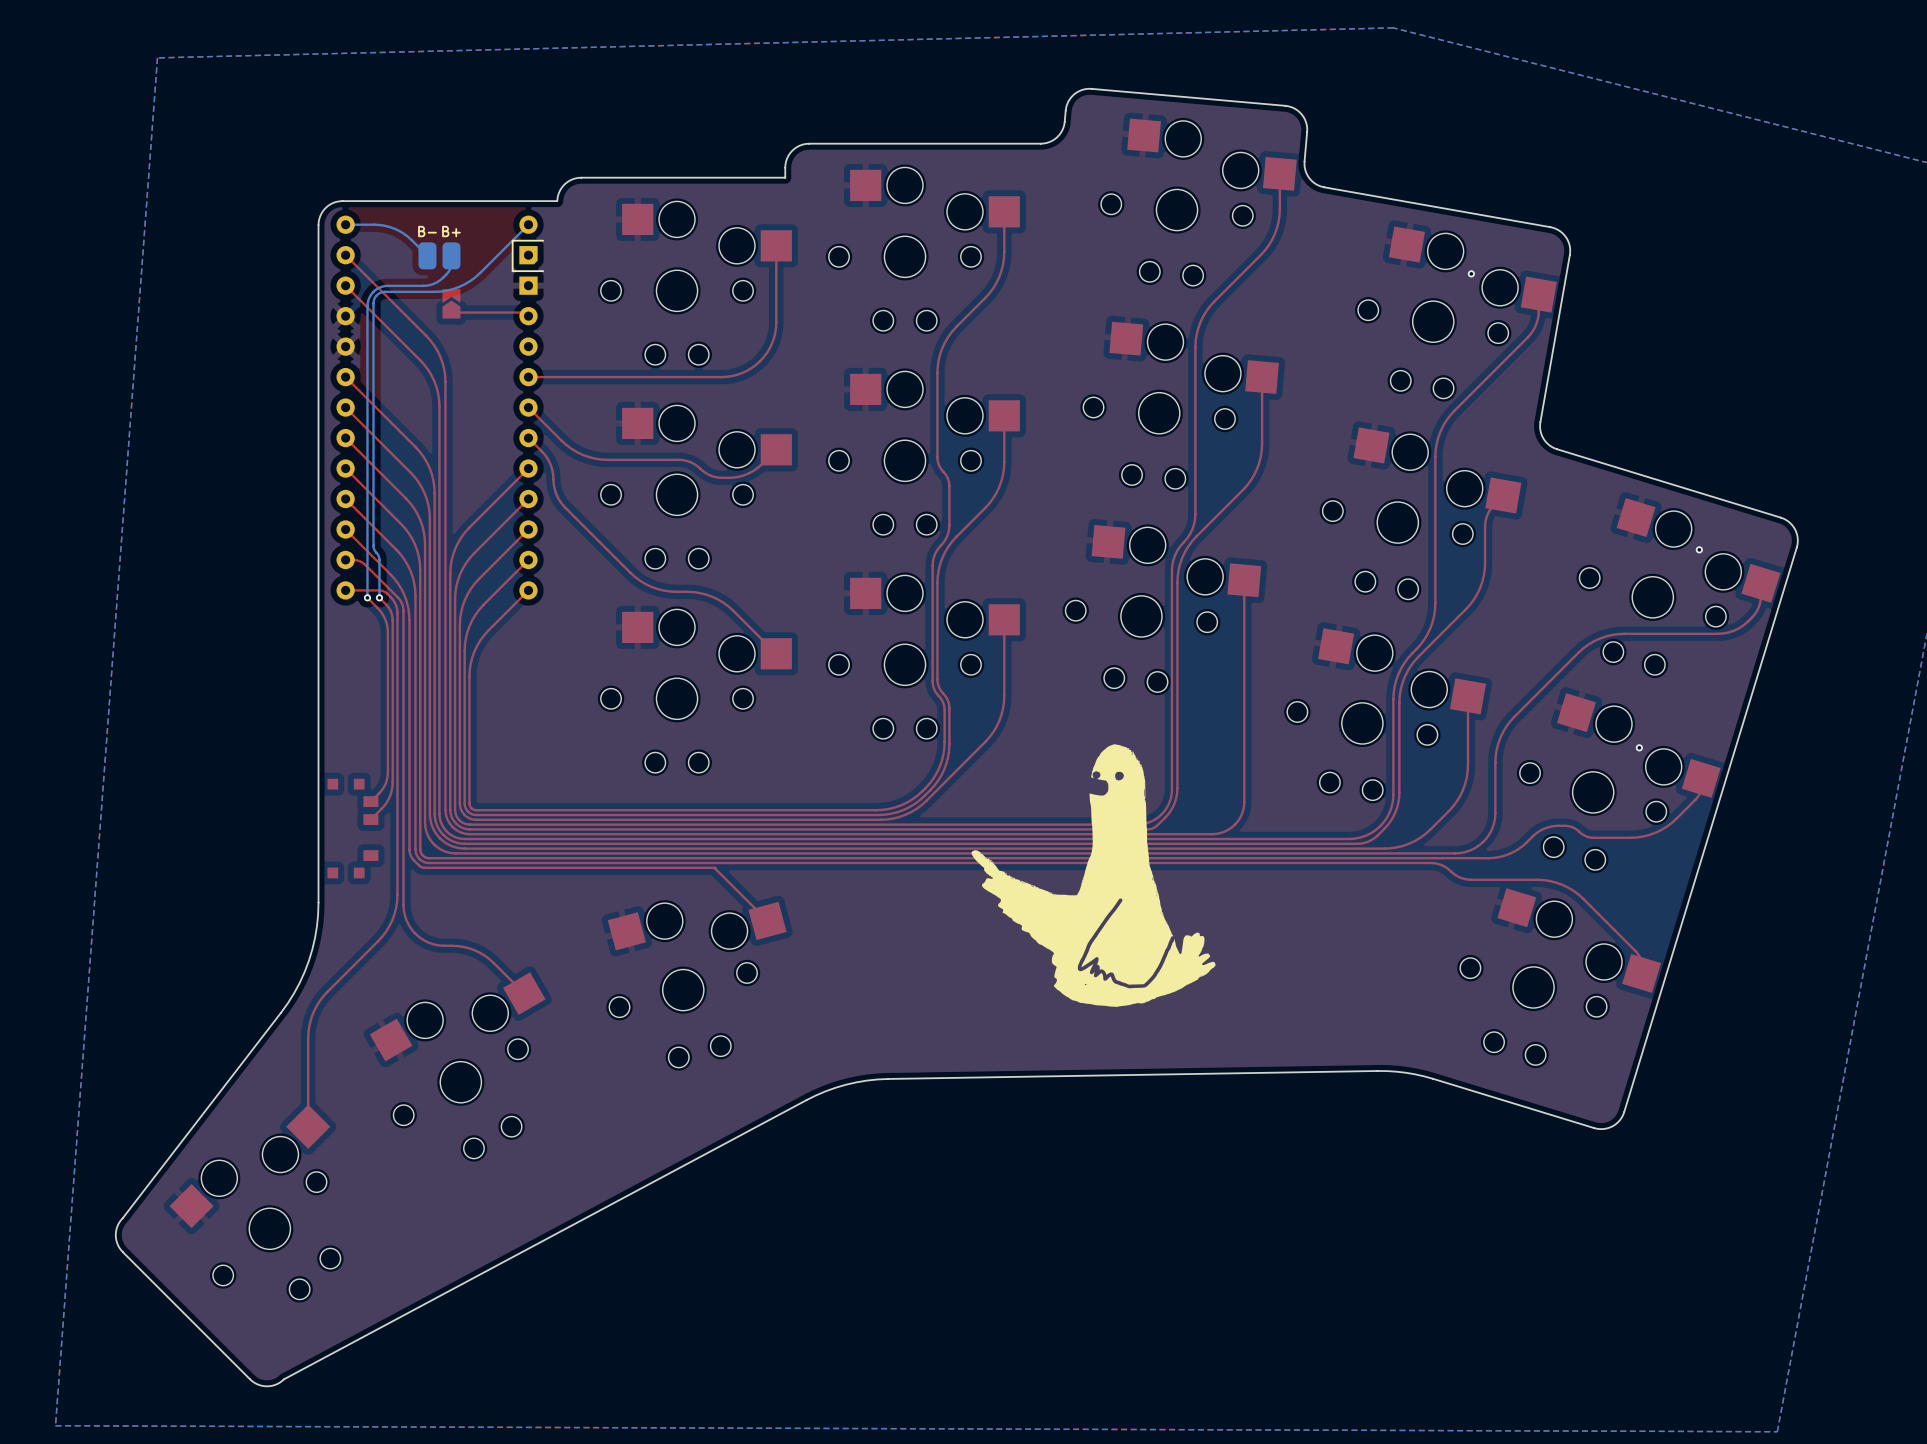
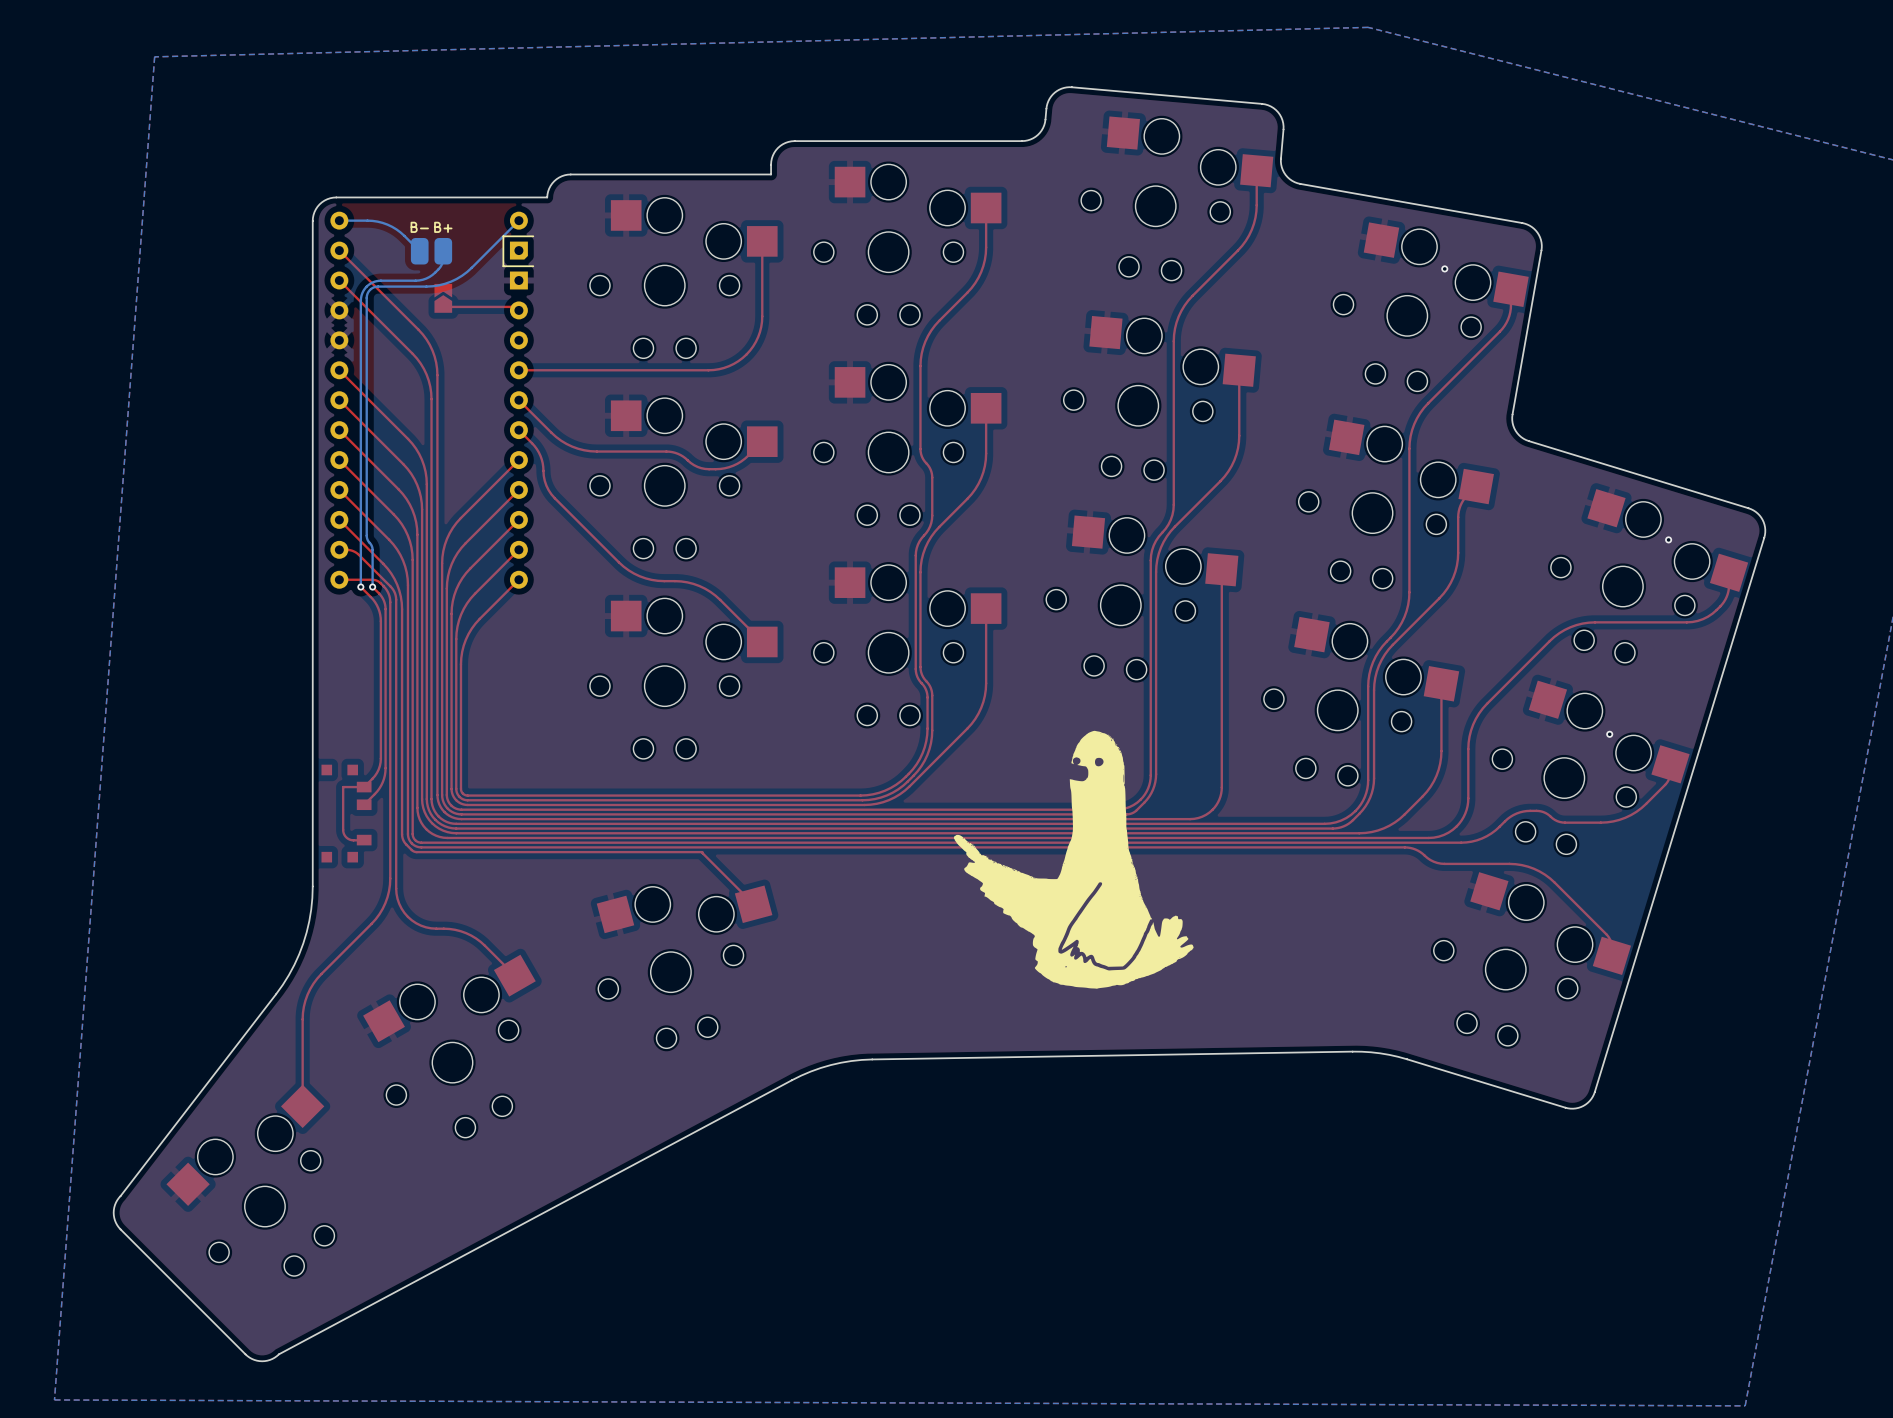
top track: none -> (364, 787) (343, 787) (343, 833) (350, 839) (363, 840)

